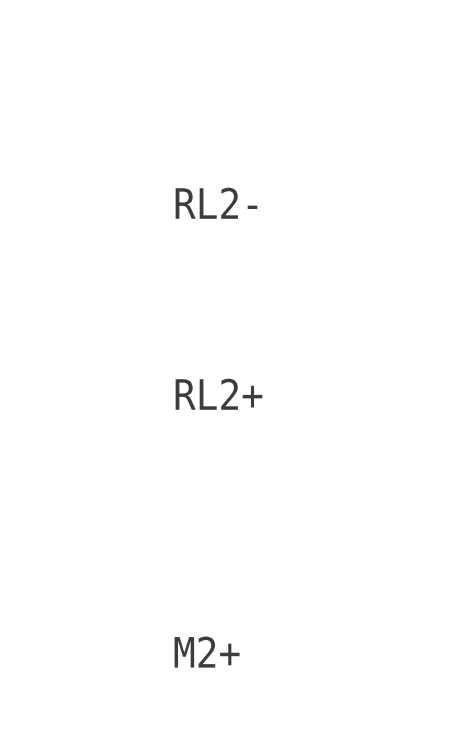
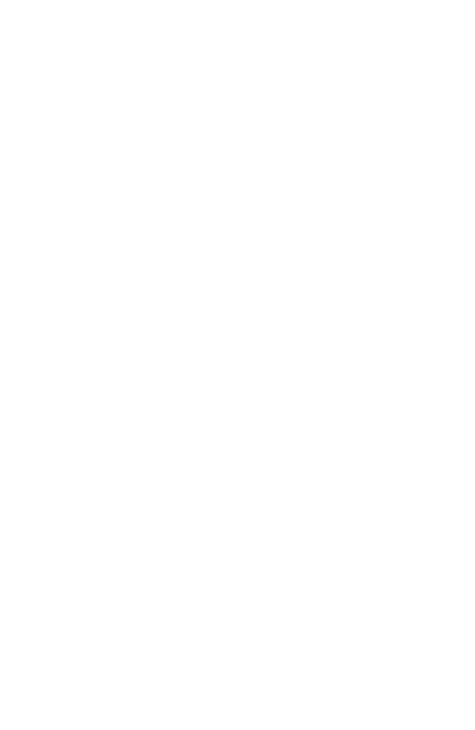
text: RL2- (216, 203) -> none
text: RL2+ (218, 394) -> none
text: M2+ (207, 652) -> none

